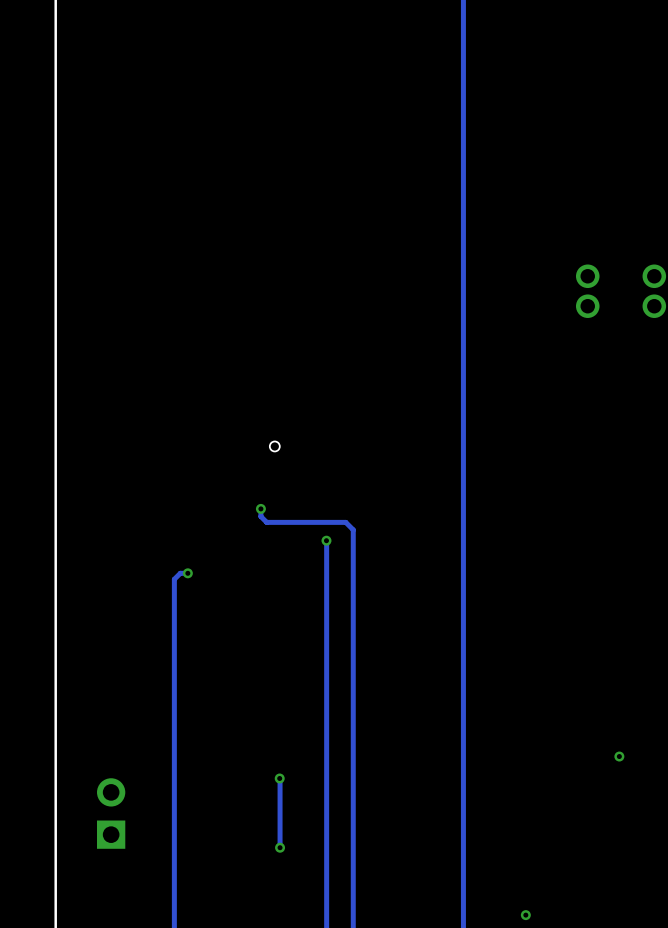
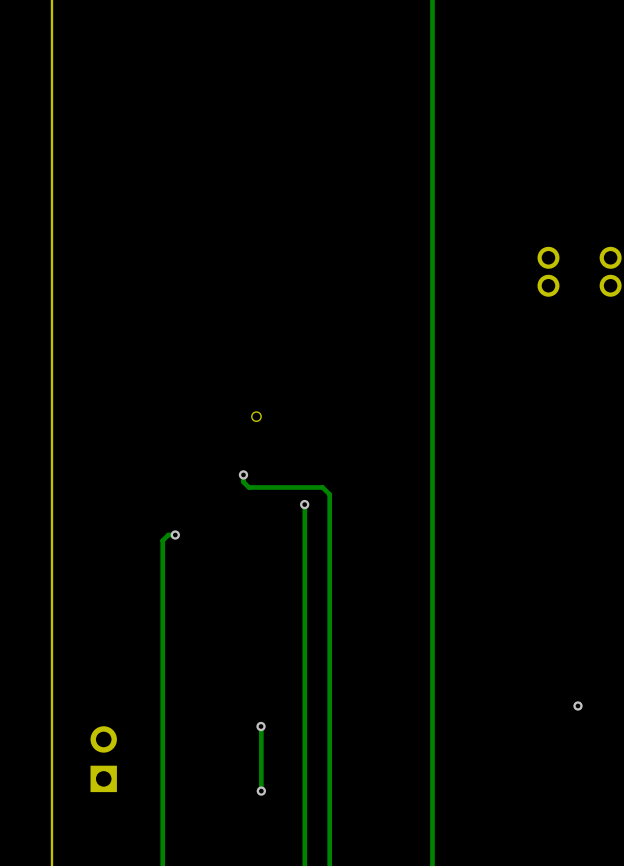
via: (525, 915) -> none

